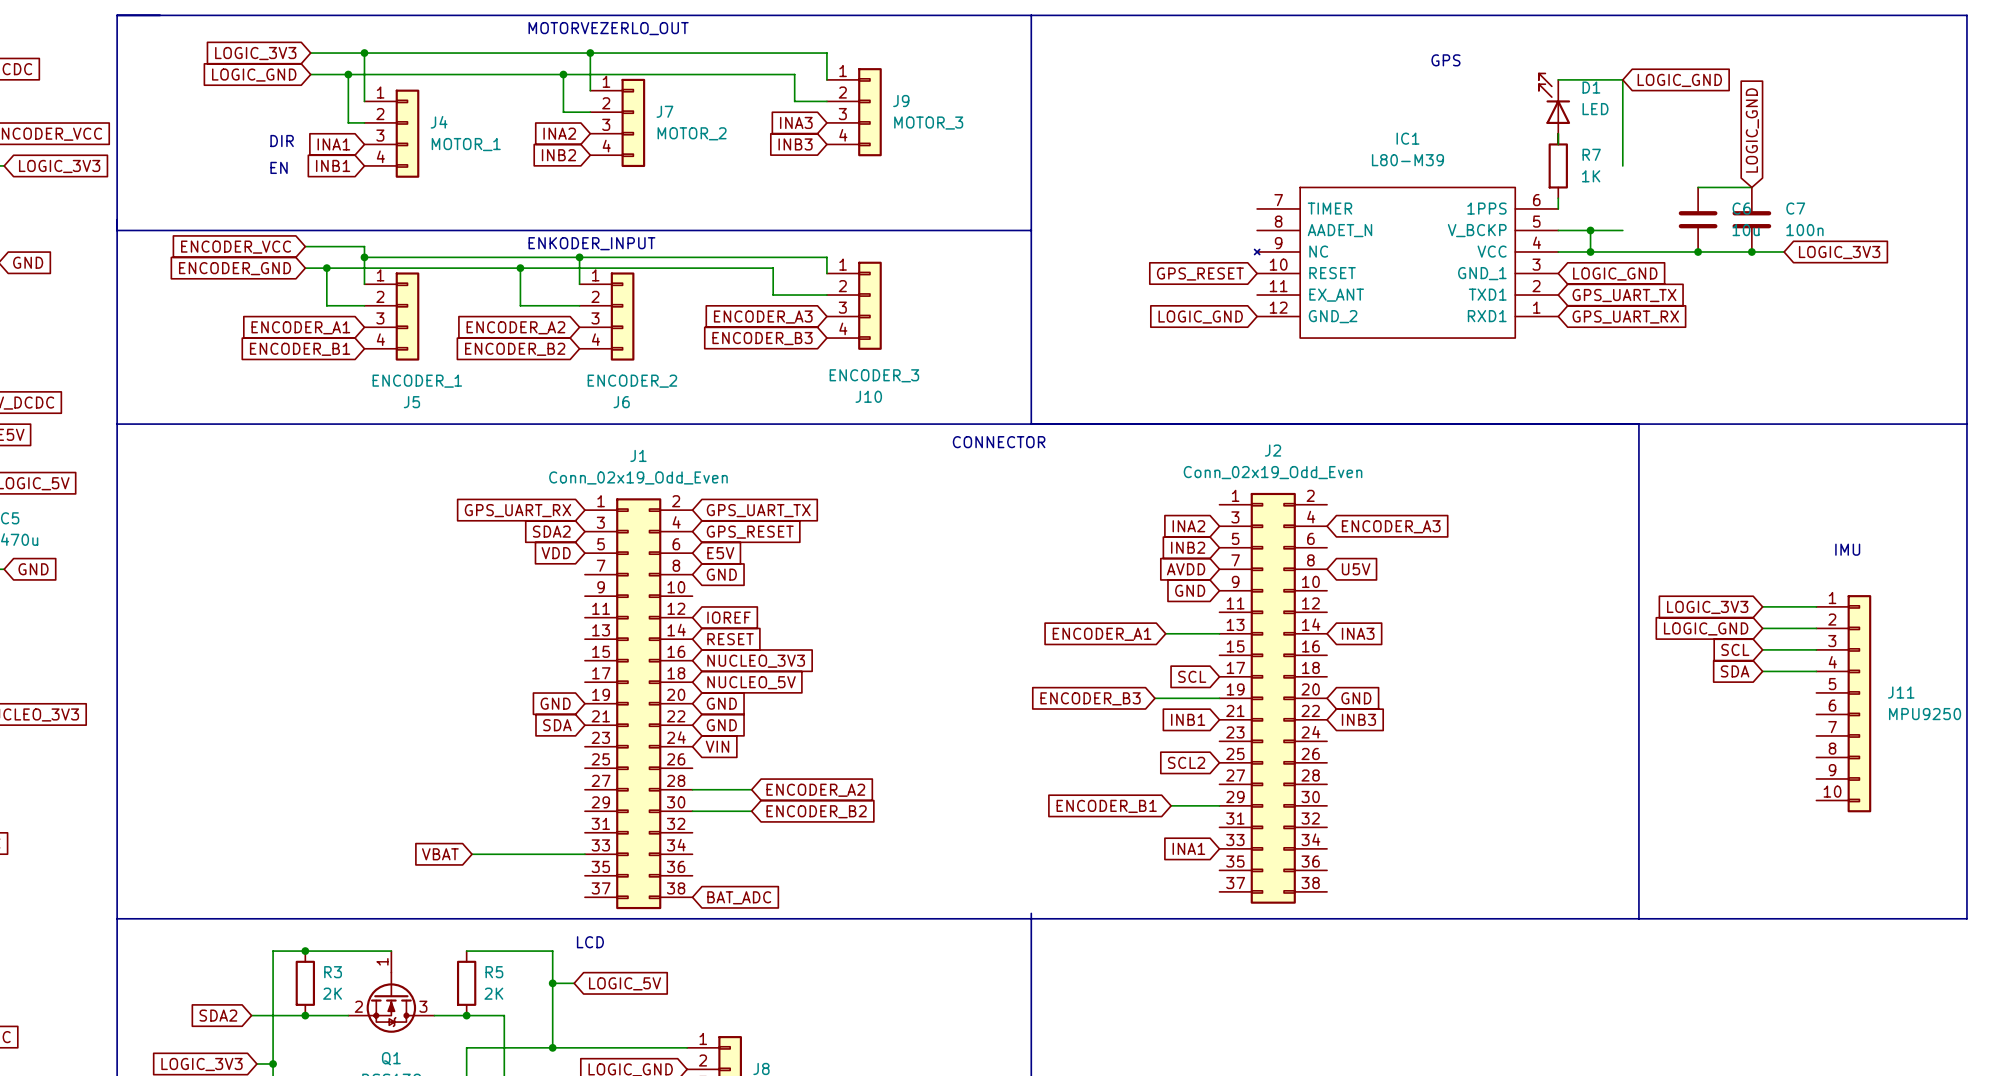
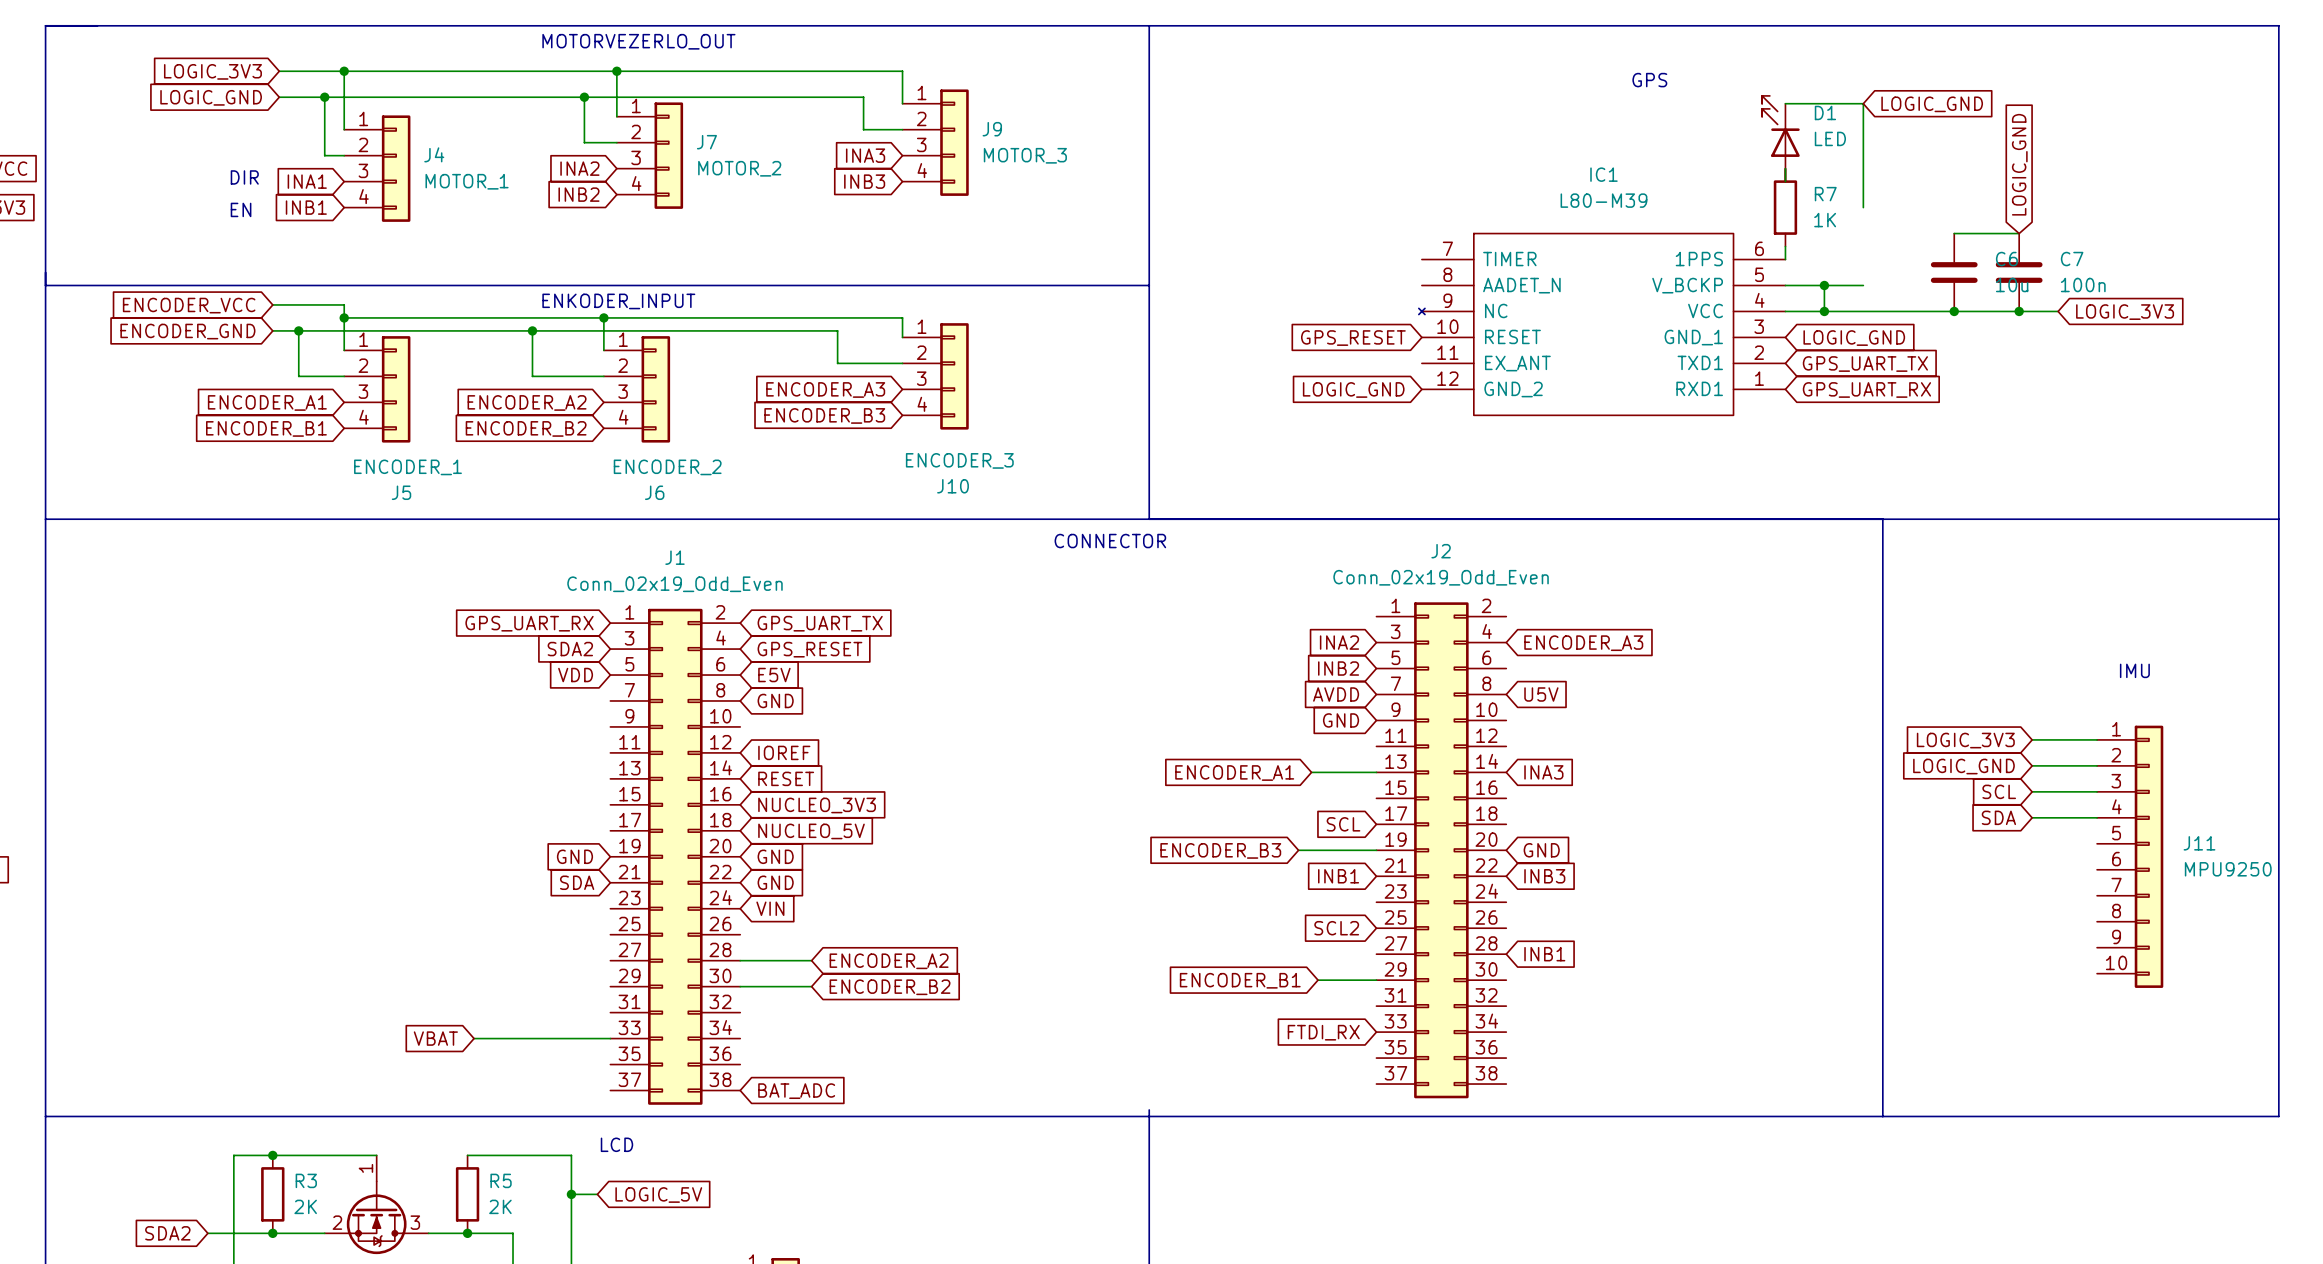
global label: none -> INB1 (1544, 954)
global label: INA1 (1188, 848) -> FTDI_RX (1323, 1032)

